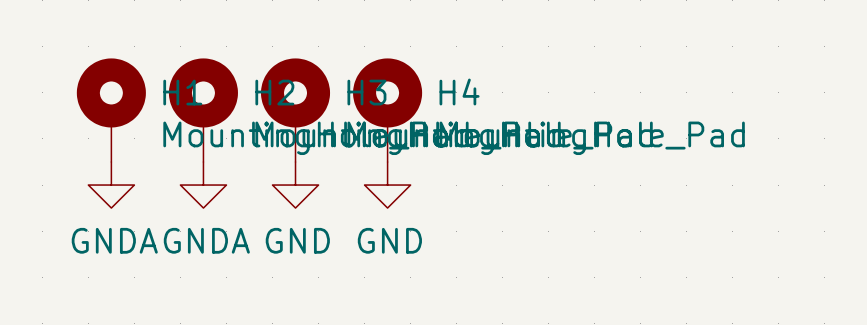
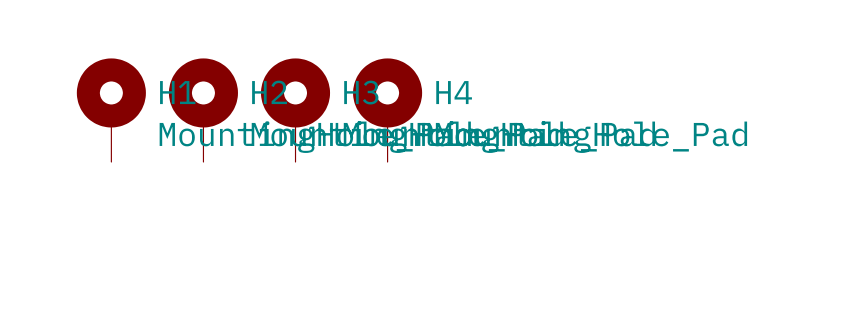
power symbol: GNDA (111, 185) -> none
power symbol: GNDA (203, 185) -> none
power symbol: GND (295, 185) -> none
power symbol: GND (387, 185) -> none

